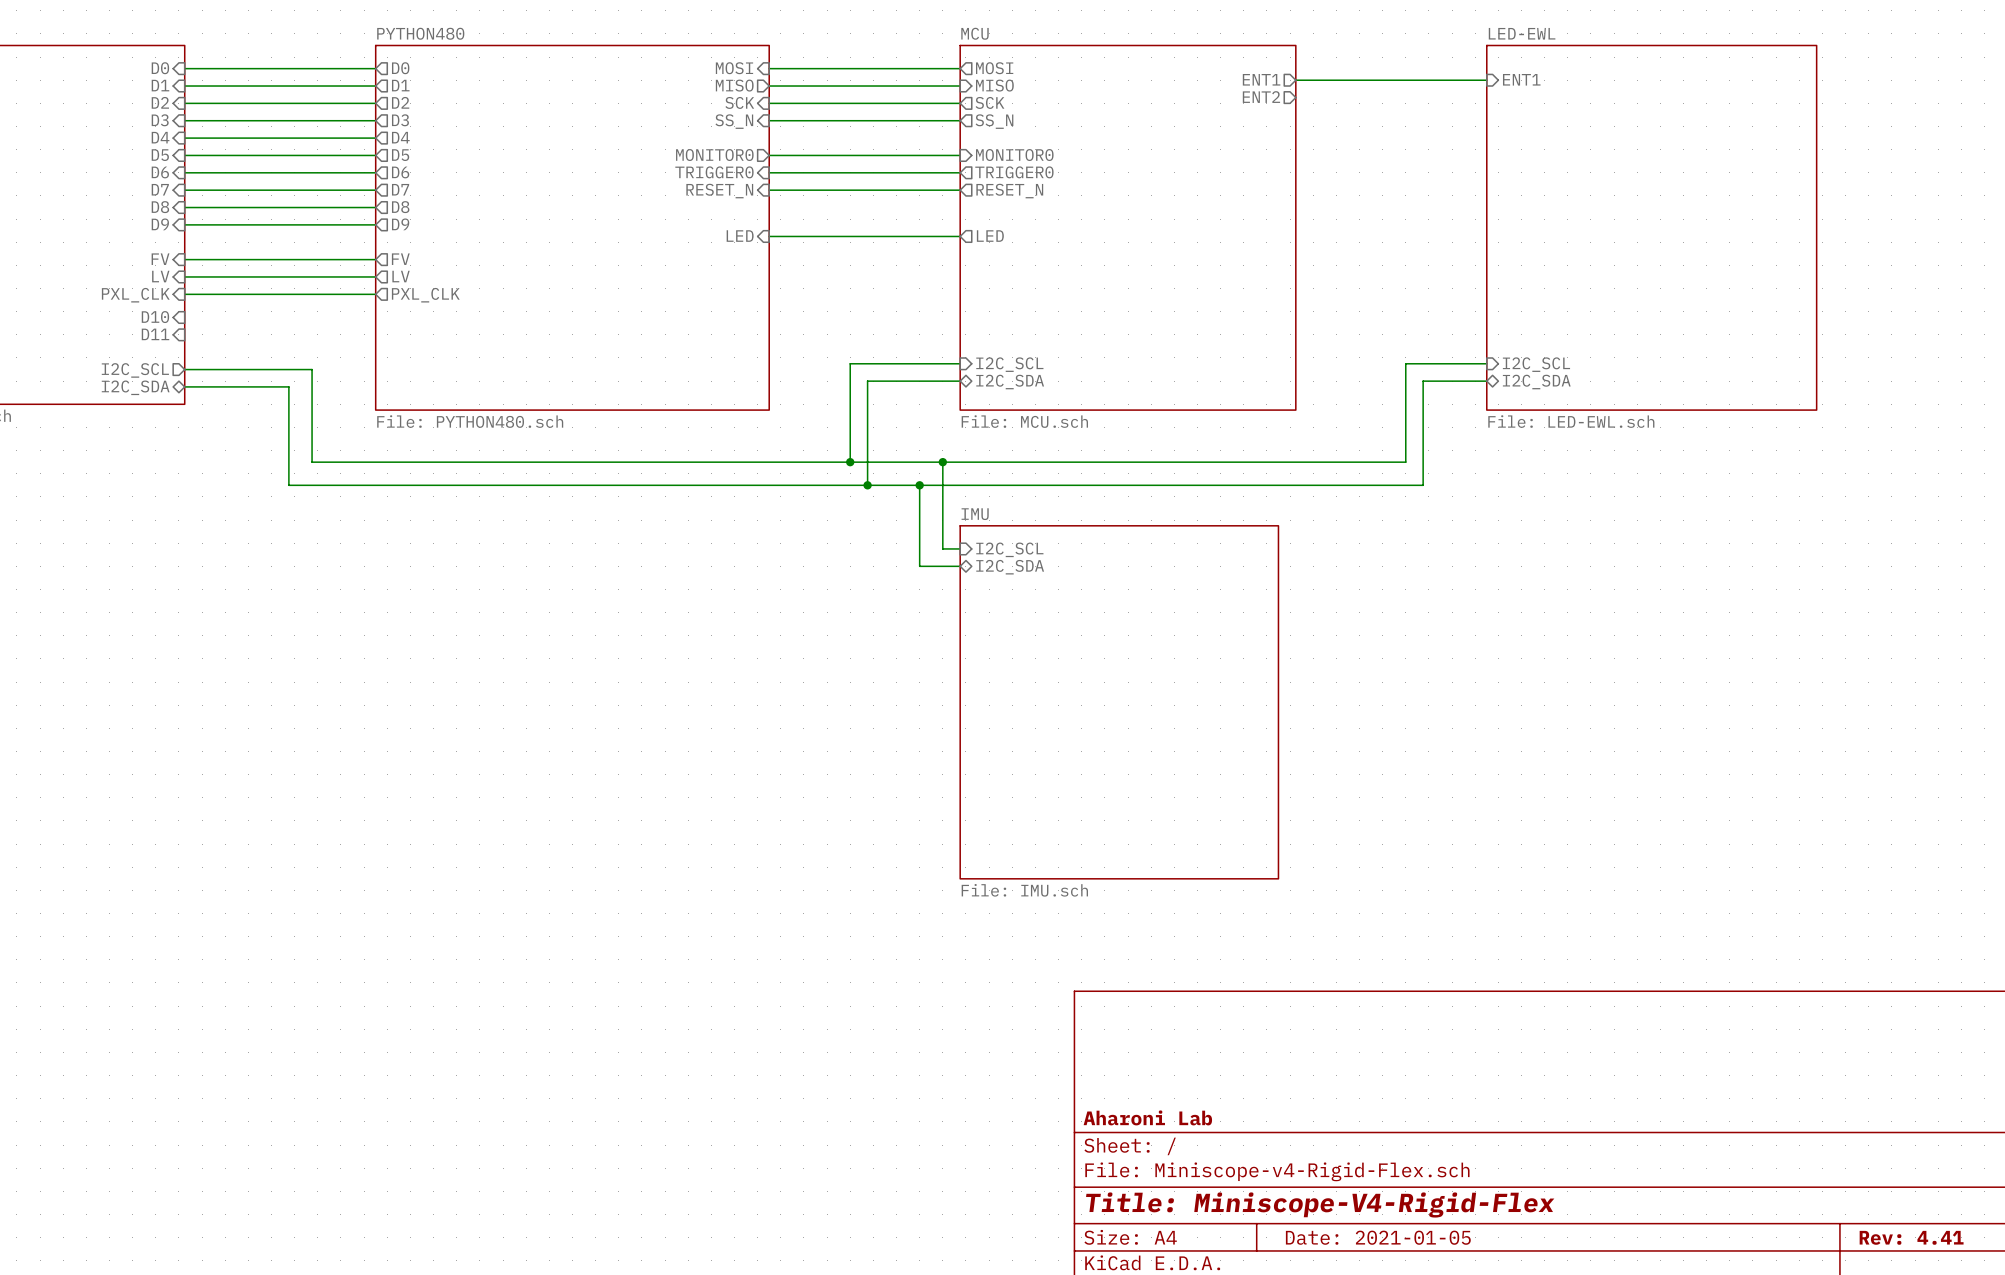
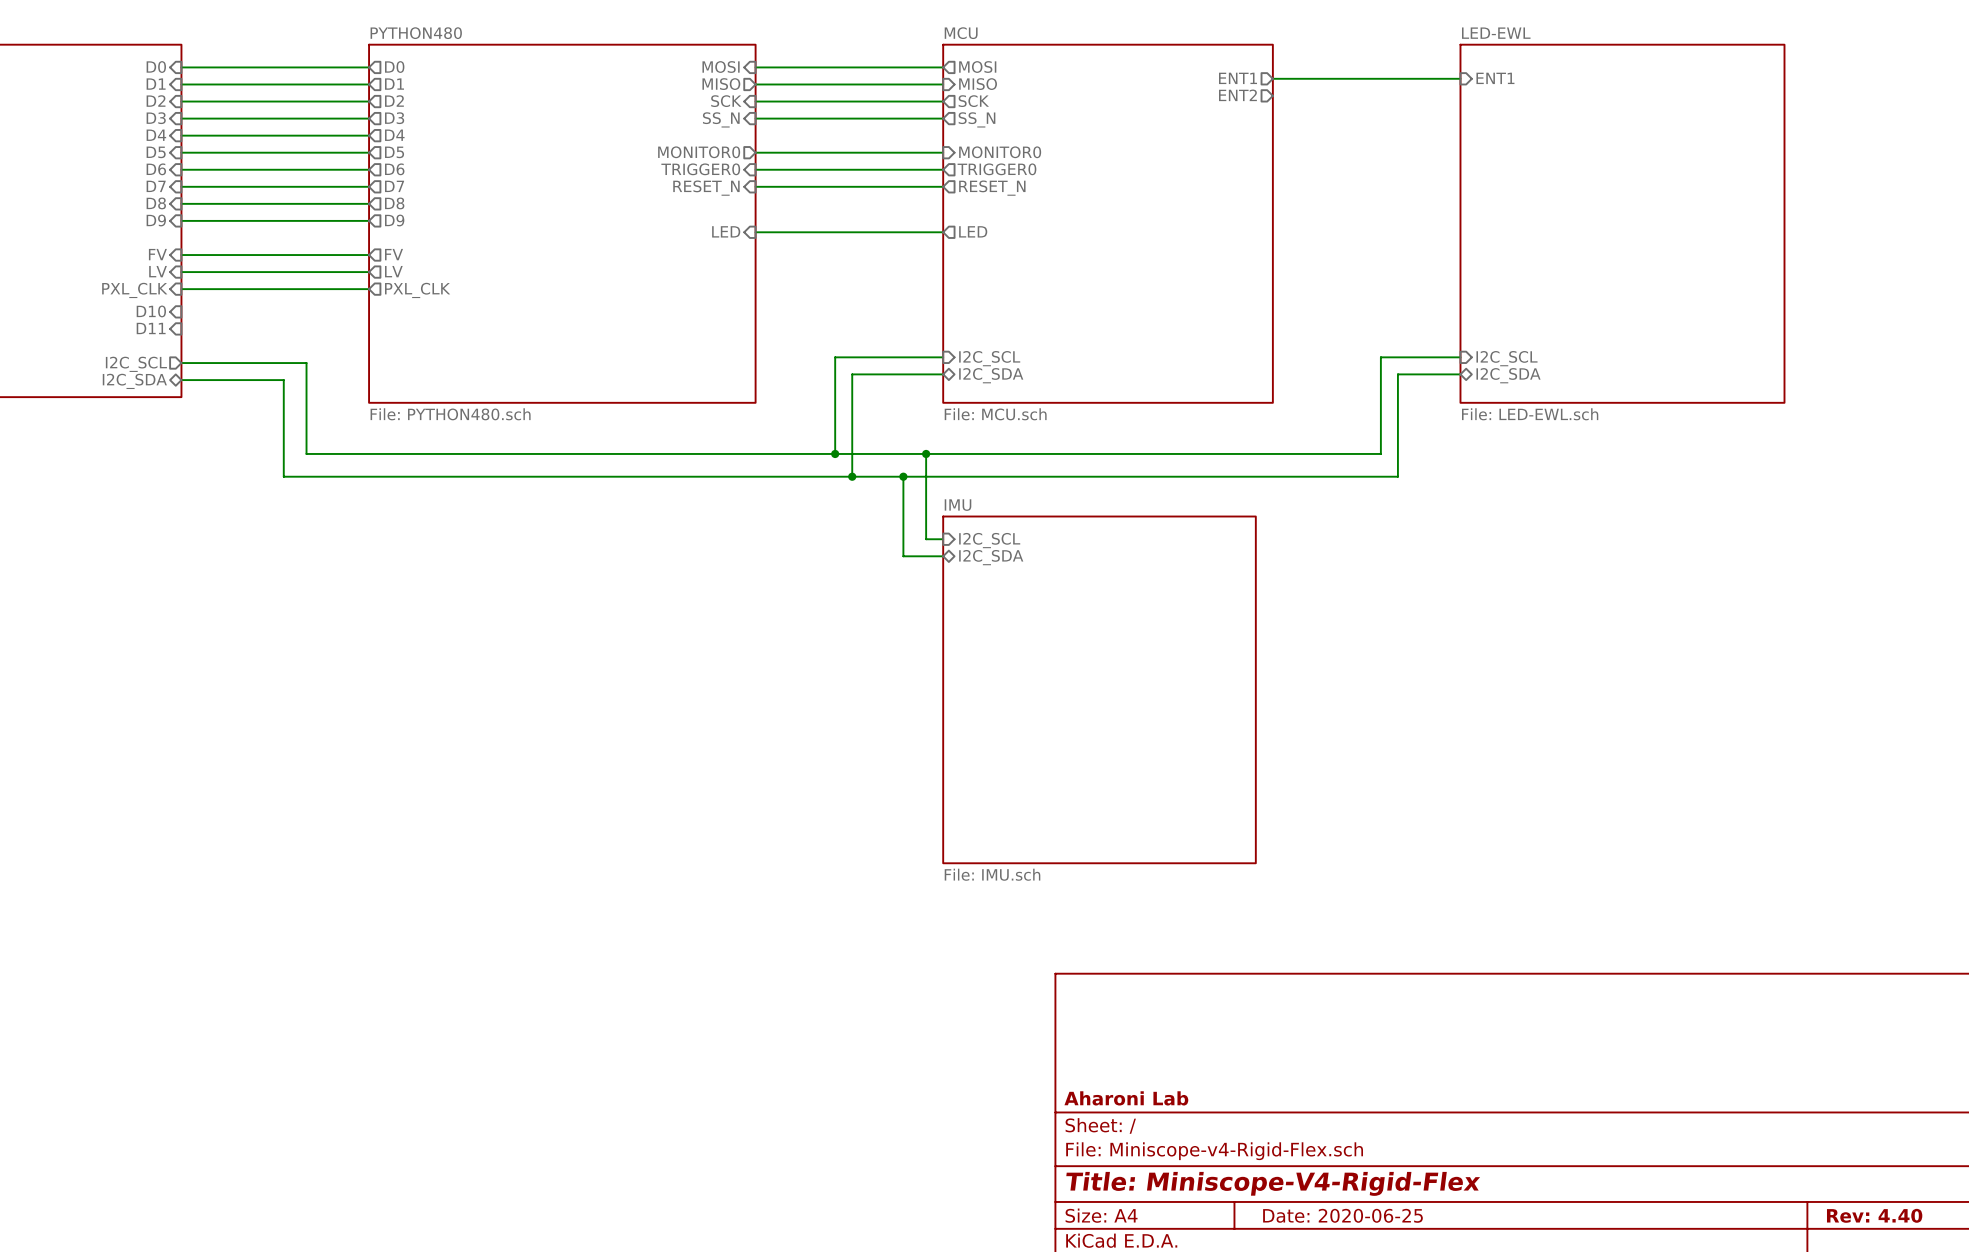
title block: Date: 2021-01-05 (1378, 1237) -> Date: 2020-06-25 (1342, 1215)
title block: Rev: 4.41 (1911, 1237) -> Rev: 4.40 (1874, 1215)

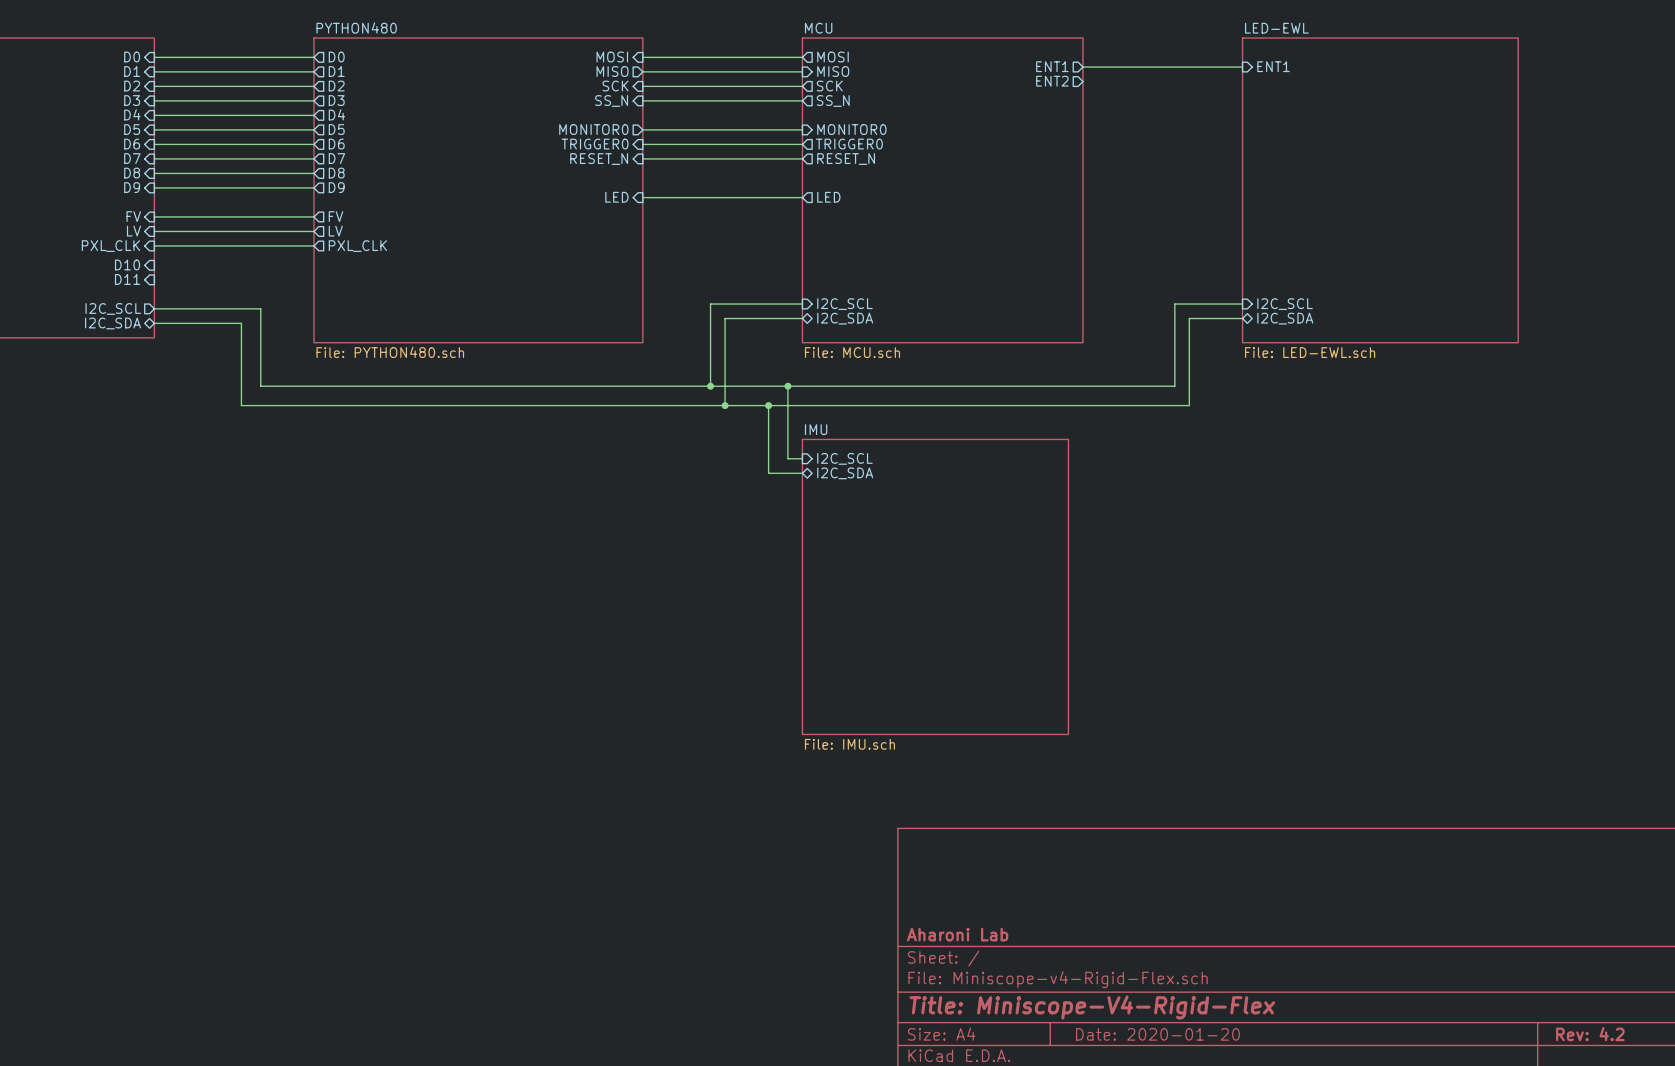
title block: Date: 2020-06-25 (1342, 1215) -> Date: 2020-01-20 (1157, 1034)
title block: Rev: 4.40 (1874, 1215) -> Rev: 4.2 (1590, 1034)

